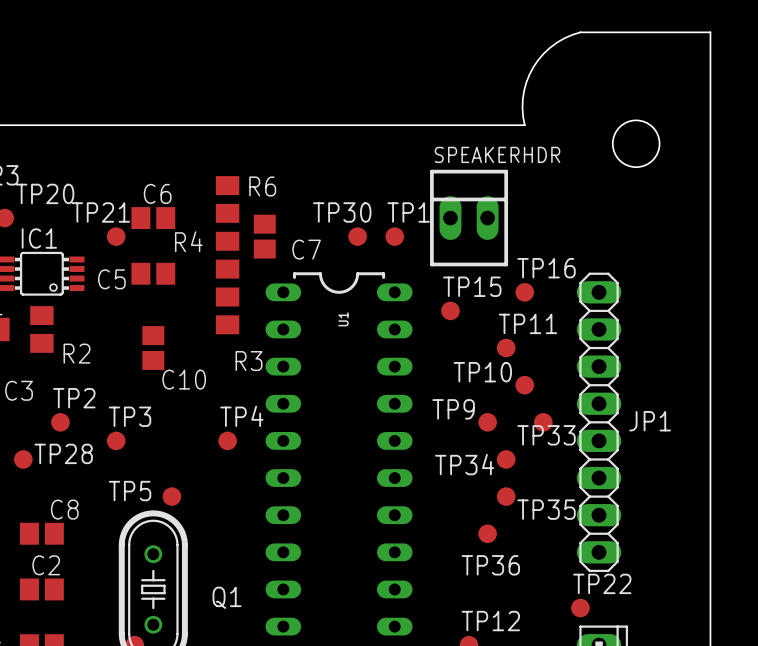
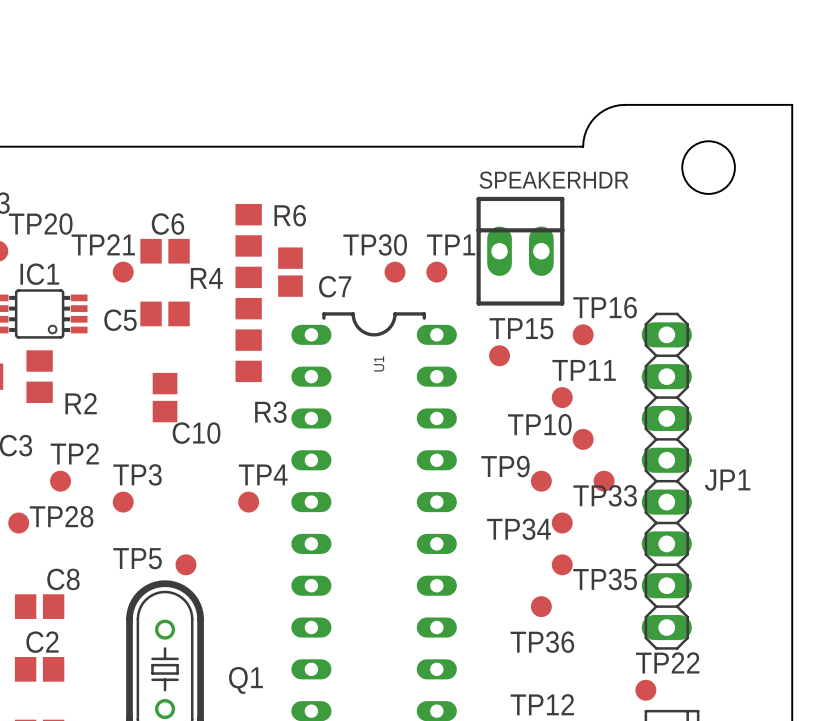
board edge: (710, 88) (710, 32) (580, 32) (564, 38) (550, 47) (533, 67) (524, 91) (522, 108) (524, 125) -> (792, 104) (614, 106) (599, 113) (591, 121) (584, 135) (583, 146)

